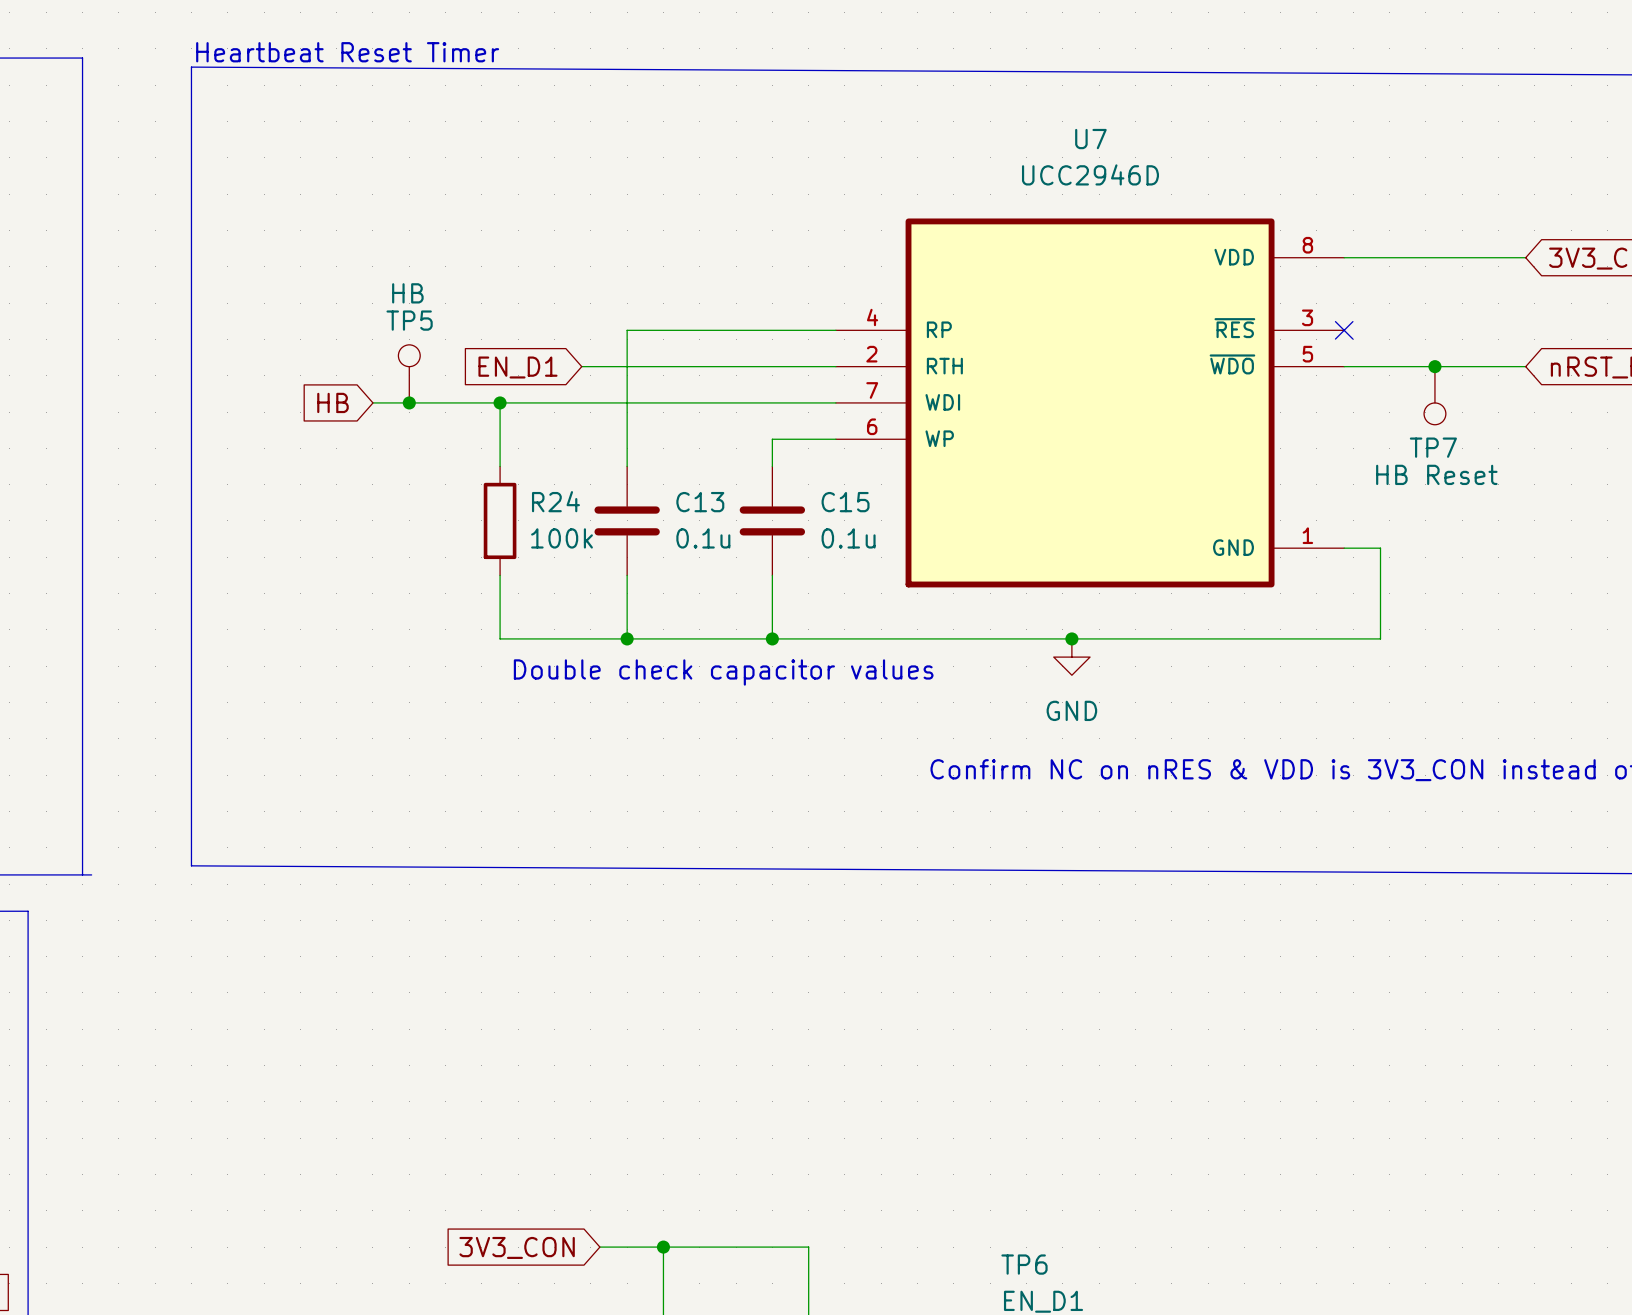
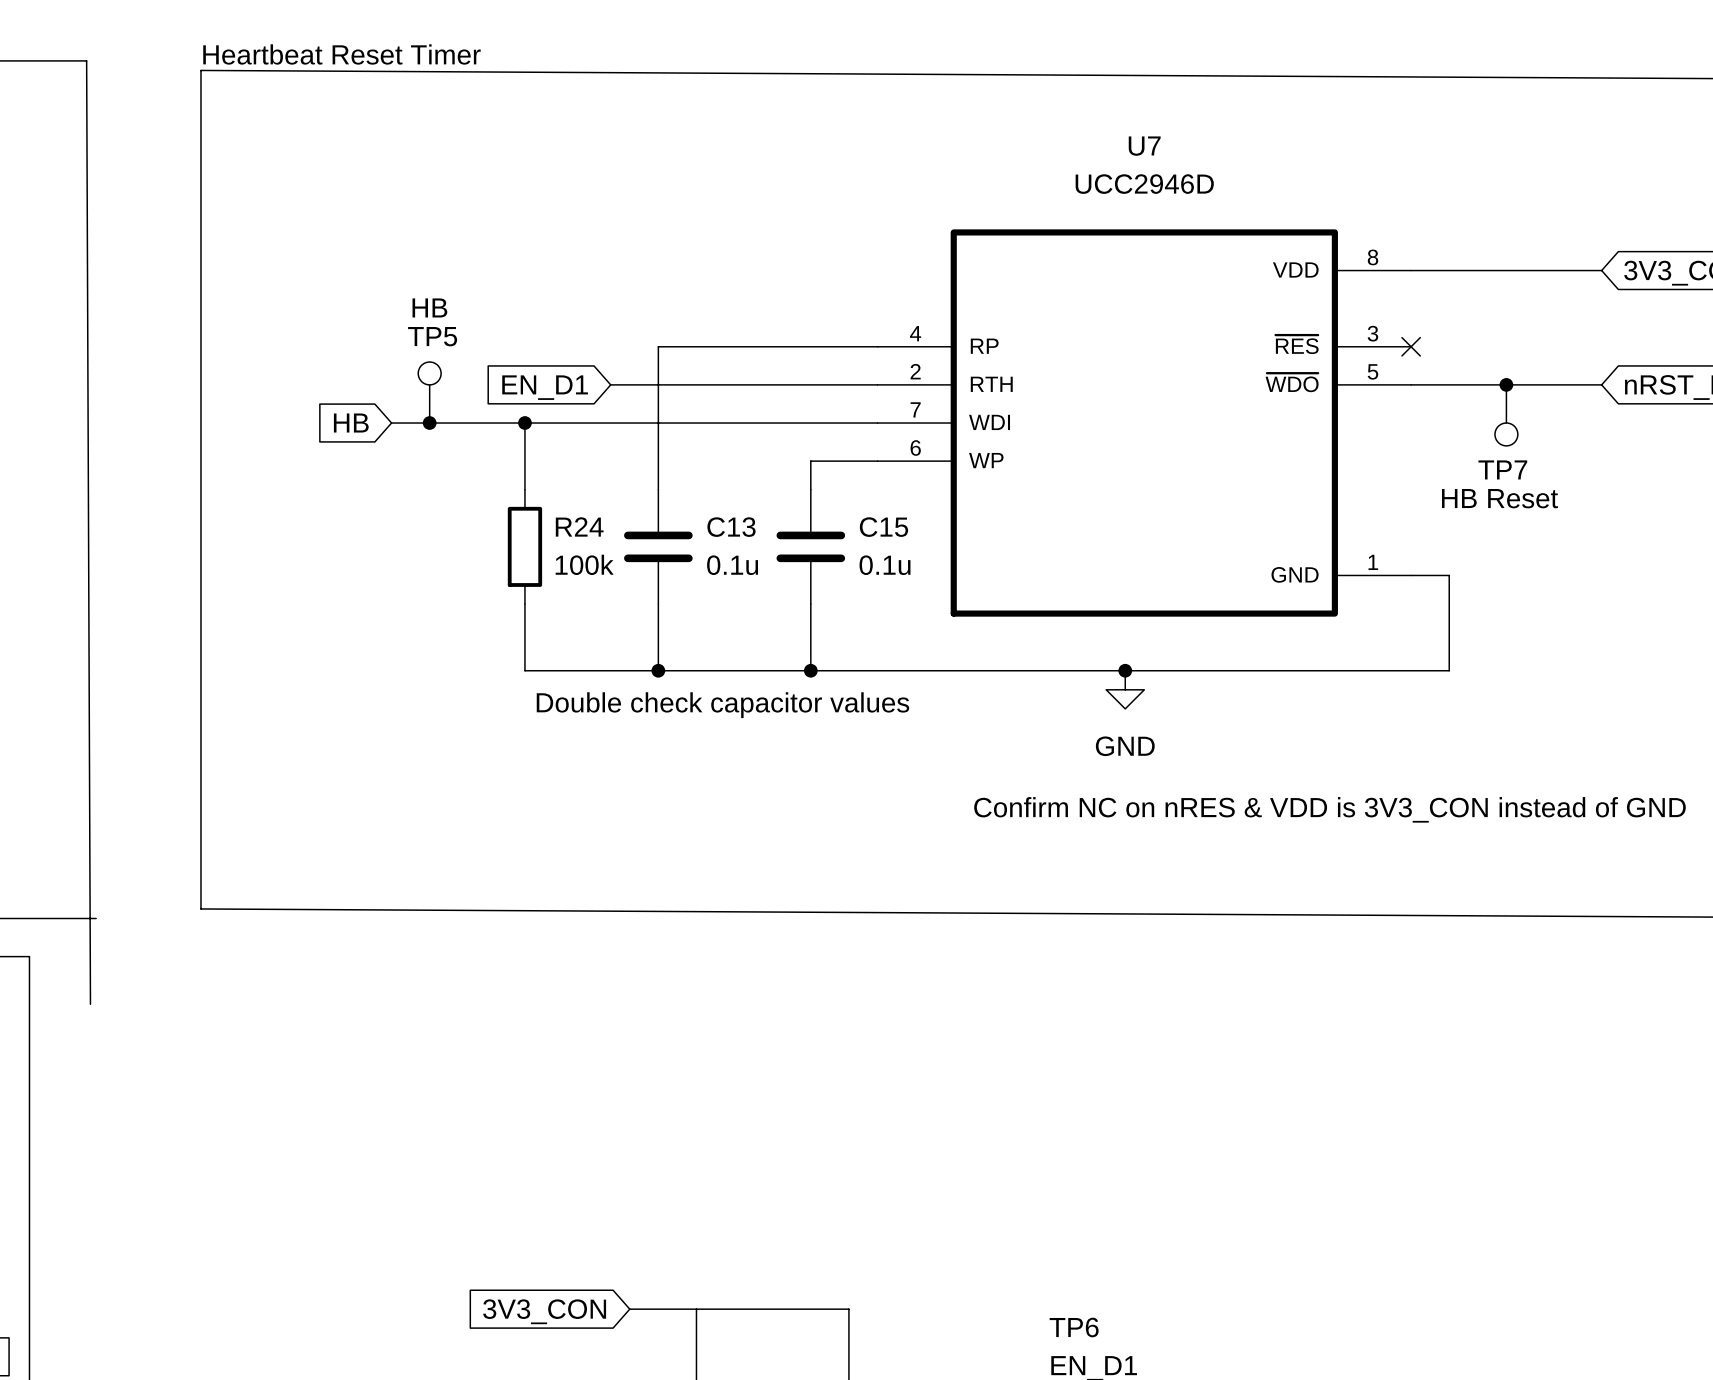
line: (82, 58) (82, 874) -> (86, 60) (90, 1004)
junction: (663, 1247) -> none

